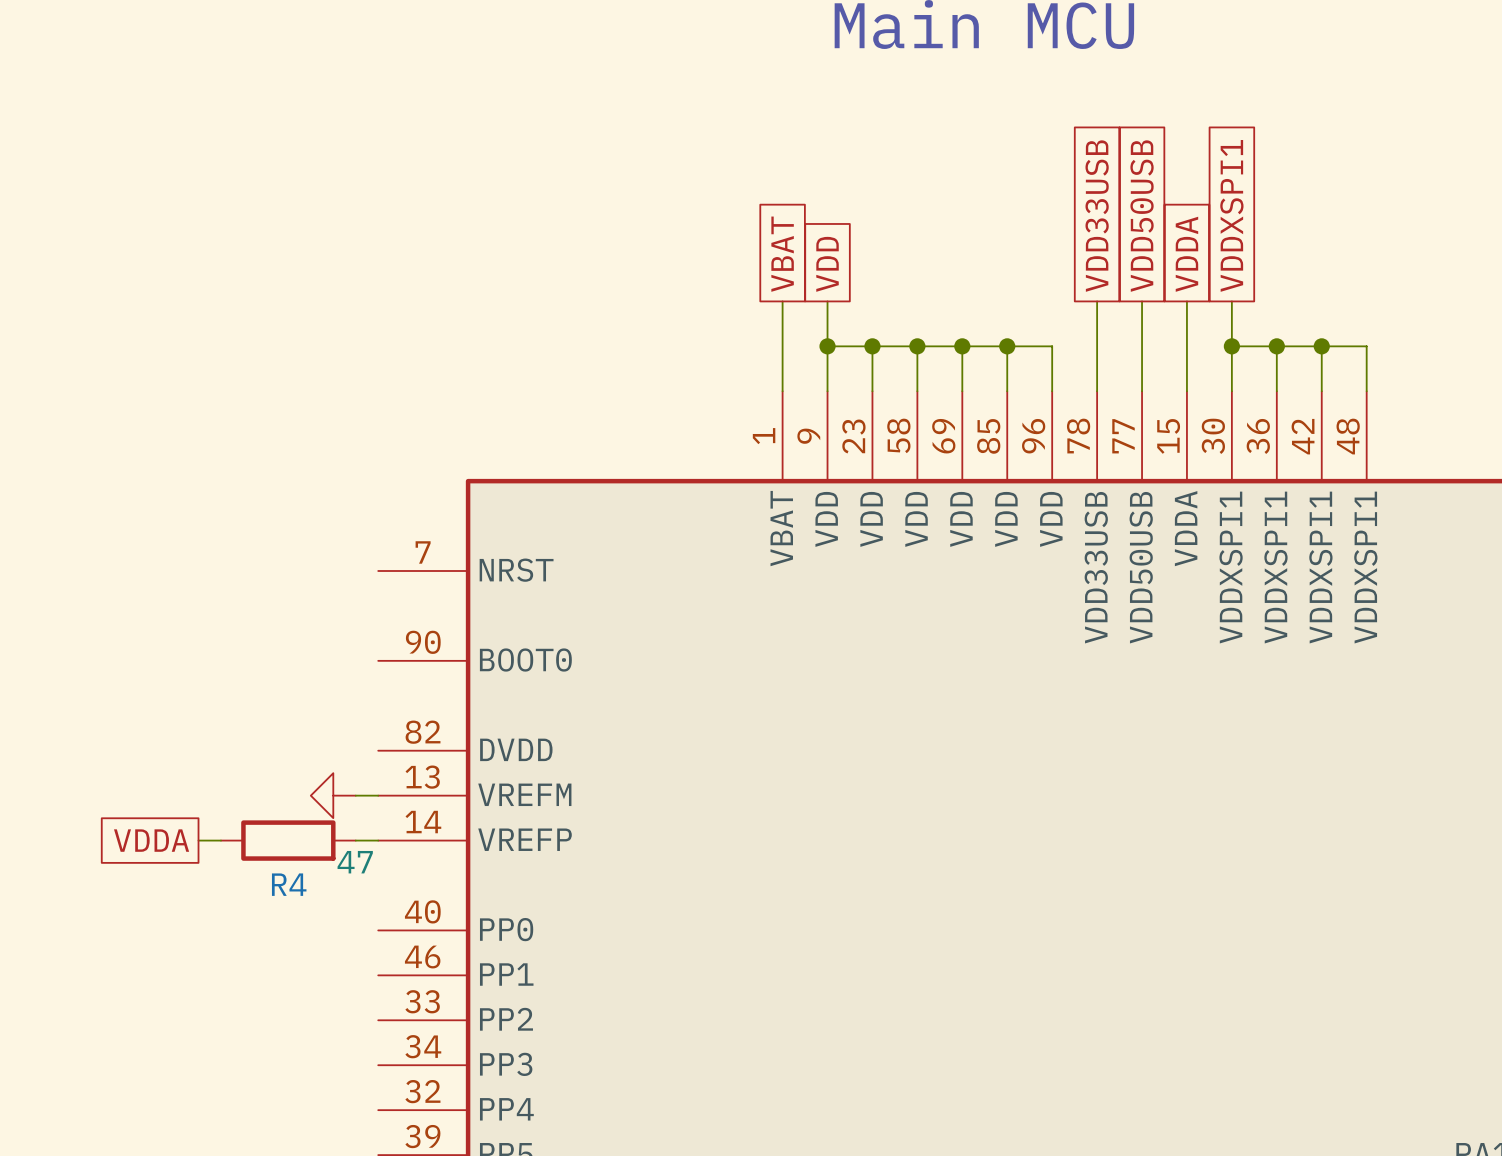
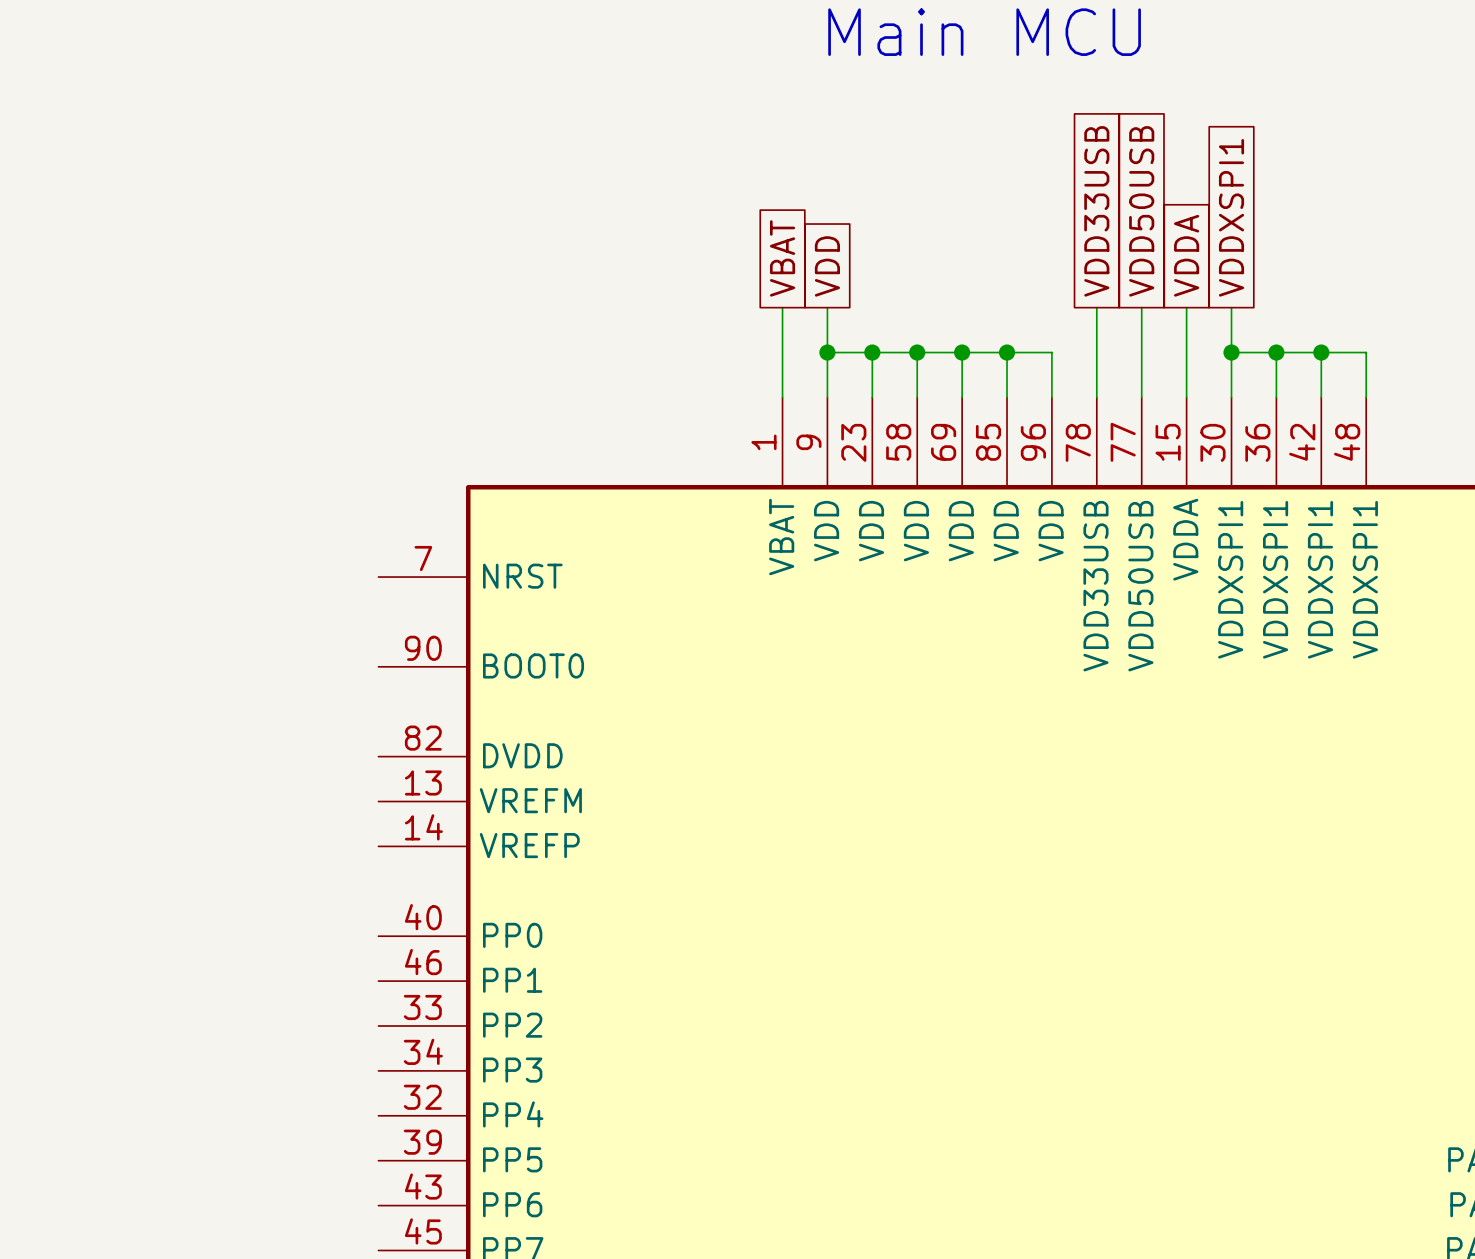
power symbol: (333, 795) -> none
wire: (355, 795) (378, 795) -> none
global label: VDDA (151, 840) -> none
wire: (198, 840) (220, 840) -> none
R4: 47 (288, 840) -> none
wire: (355, 840) (378, 840) -> none

